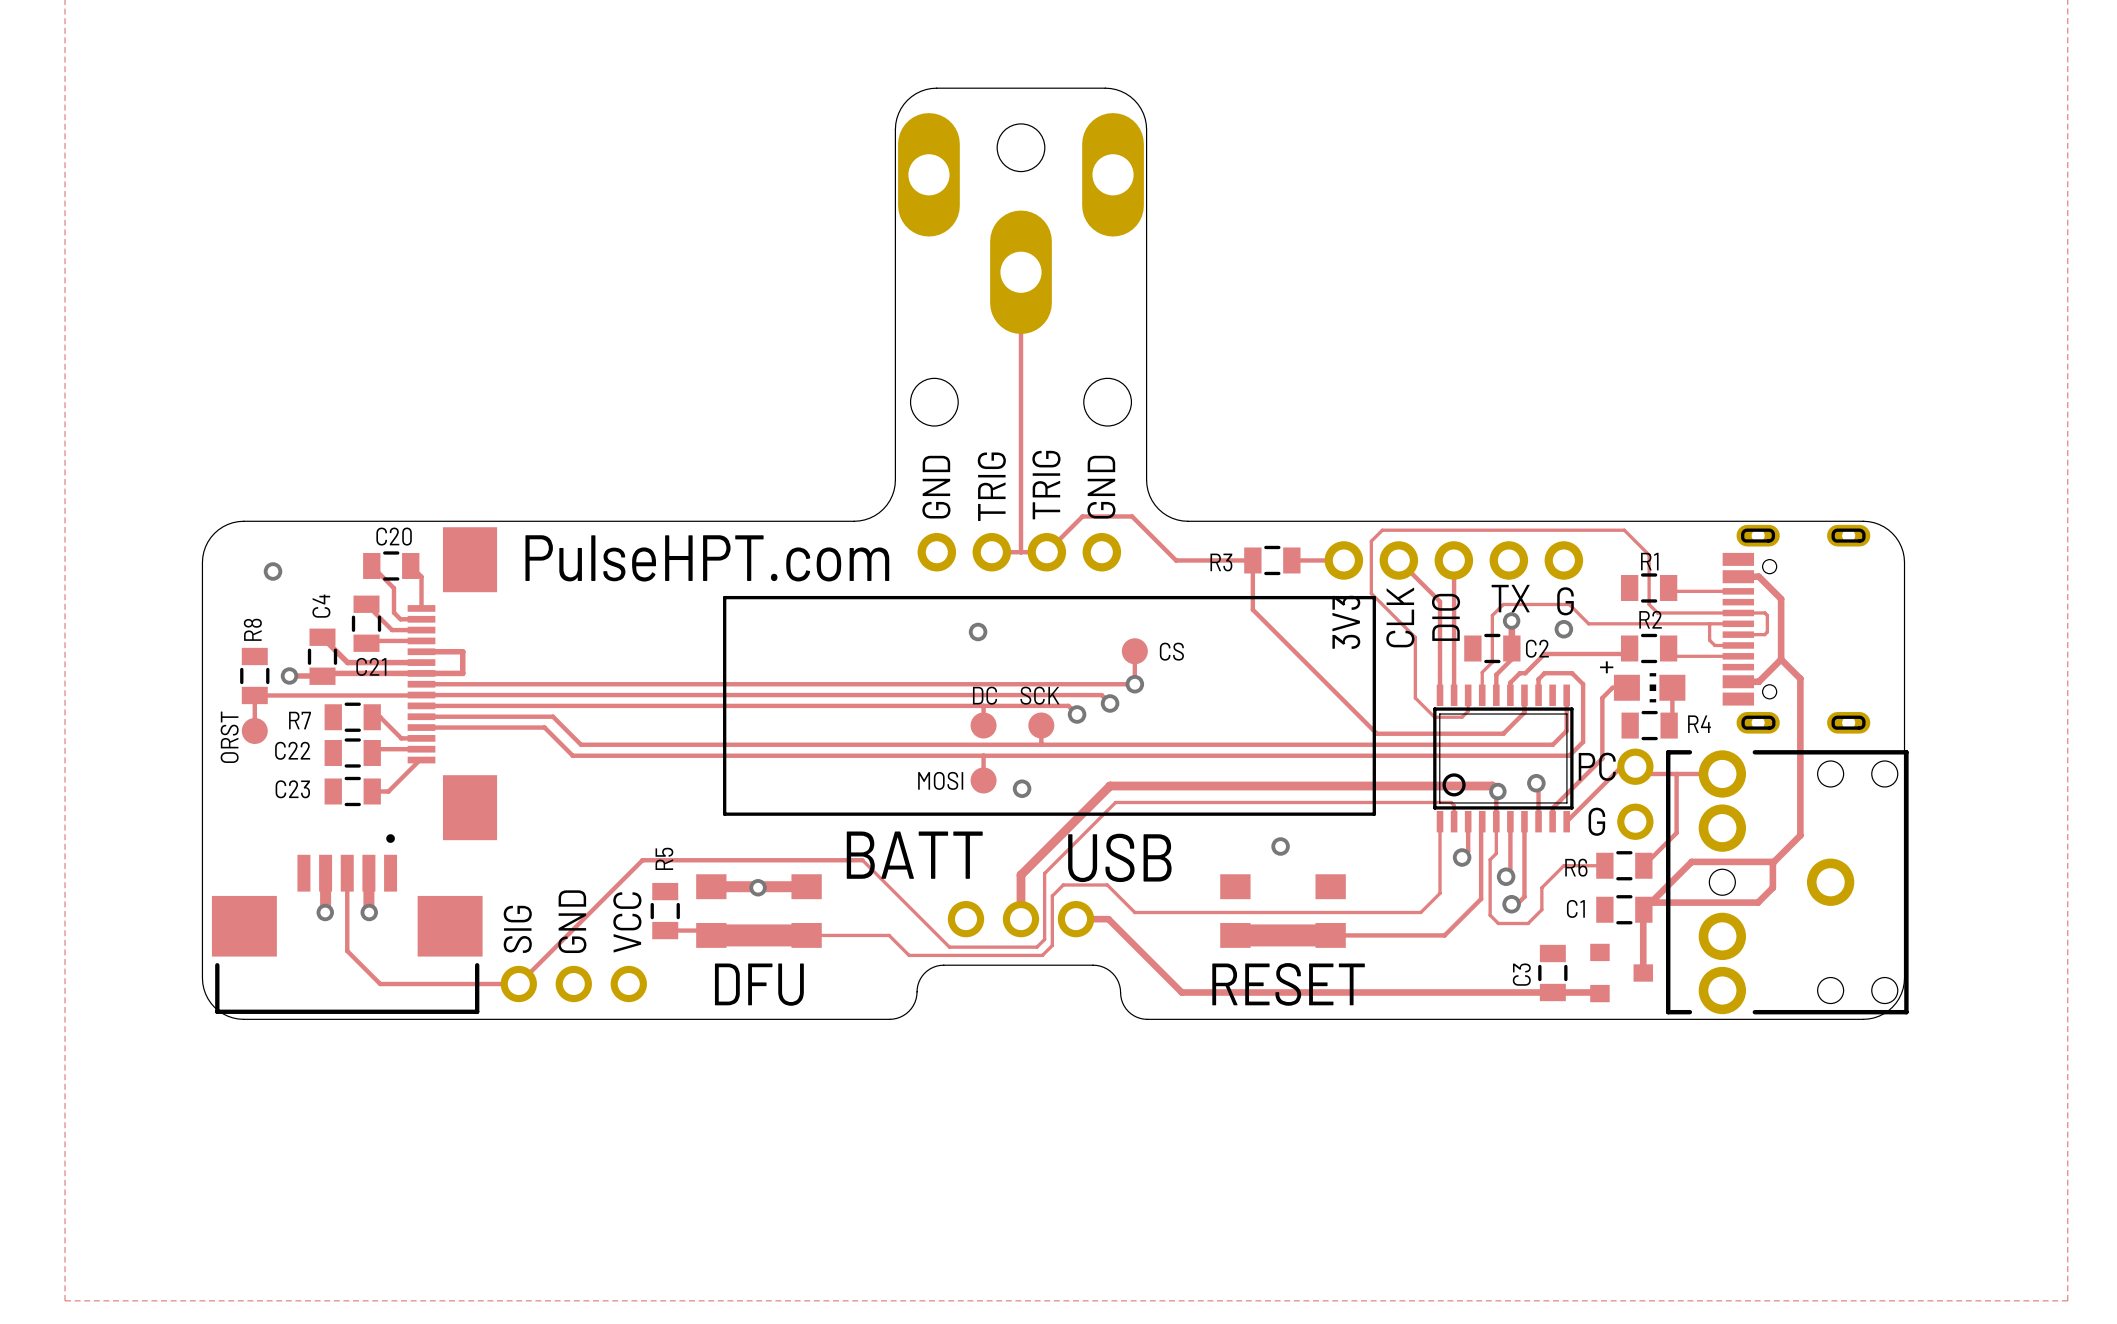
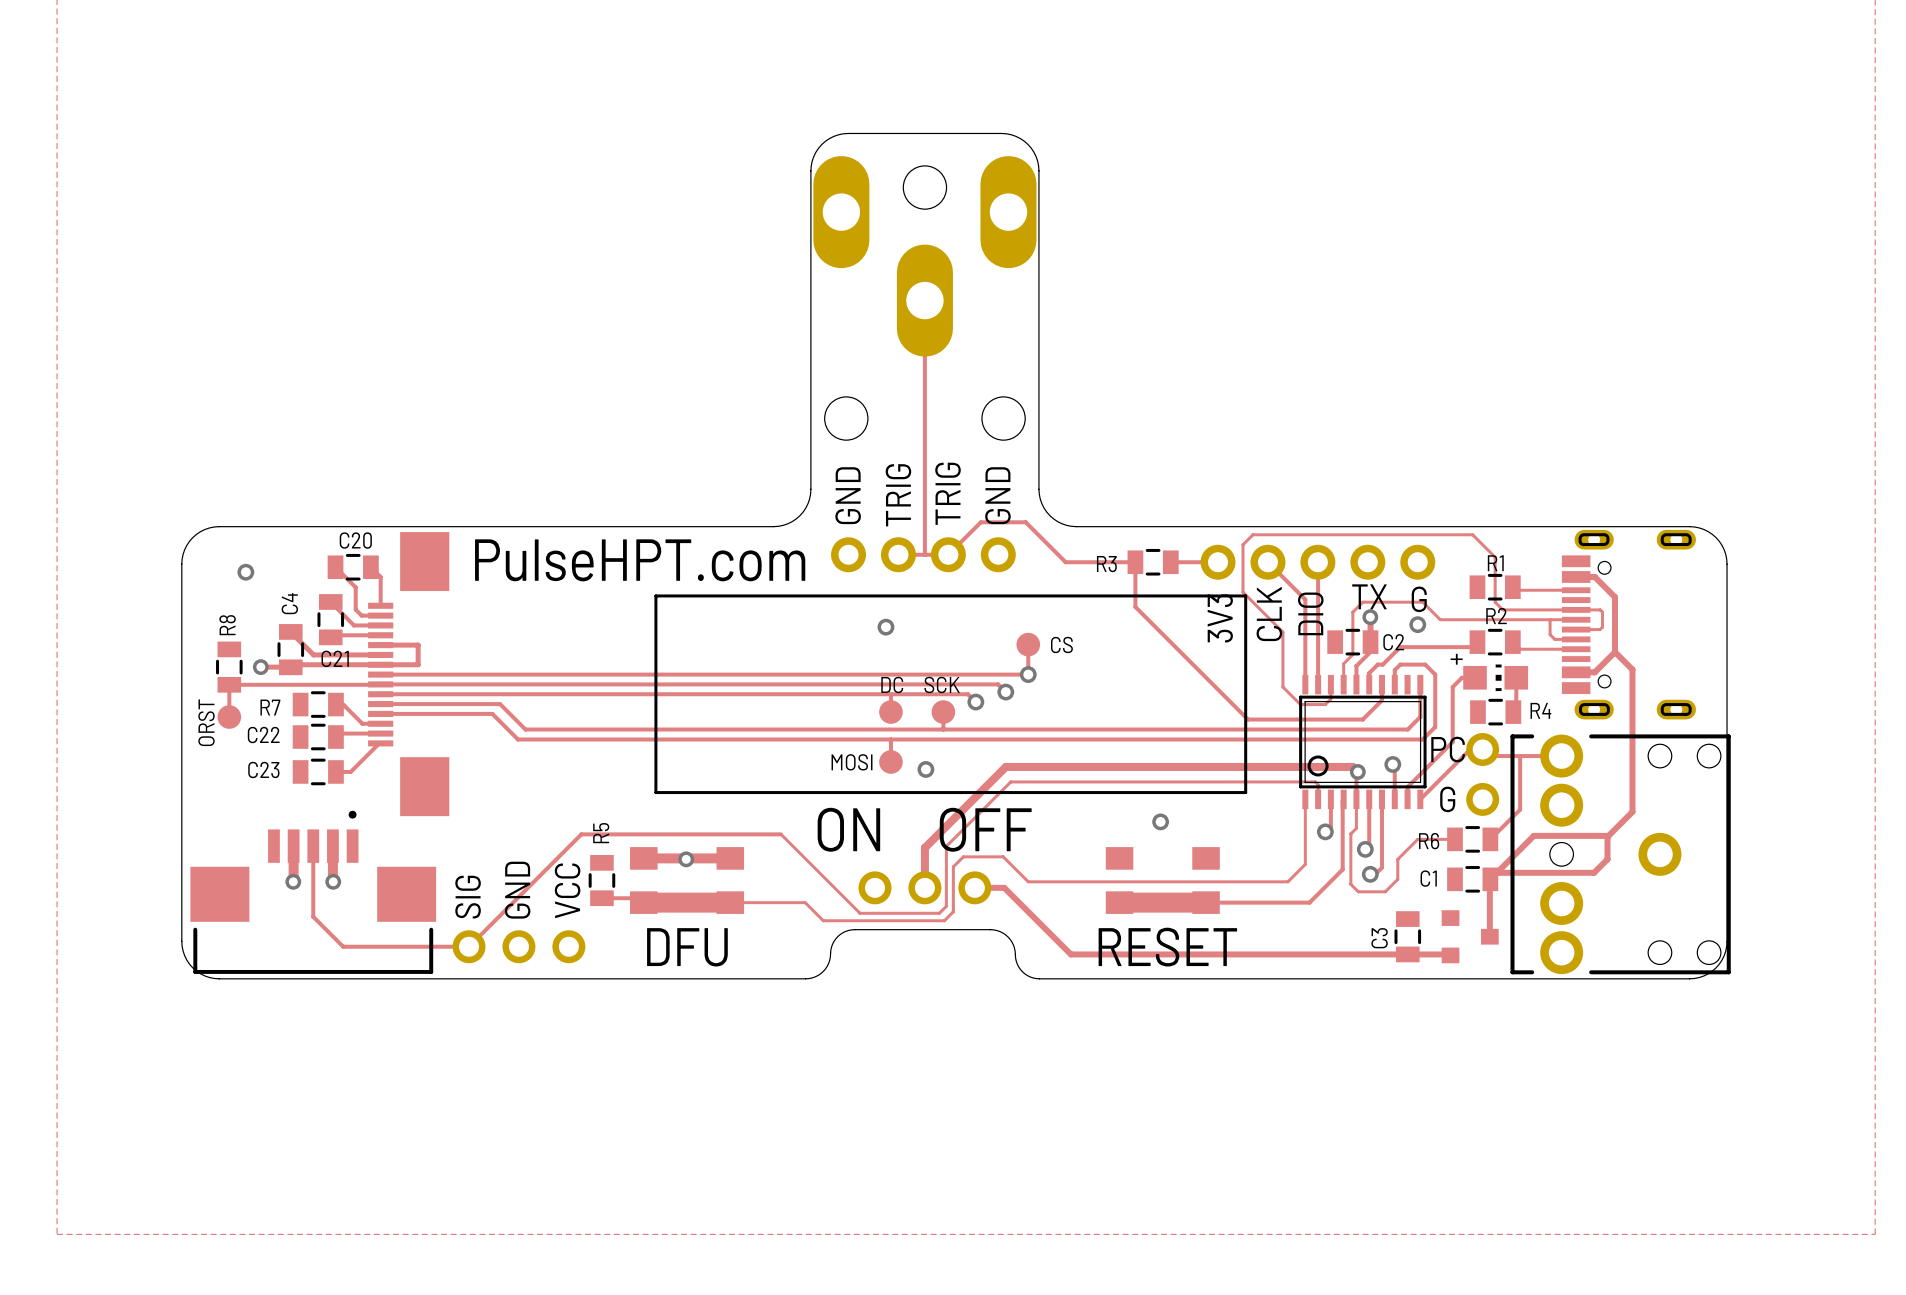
text: BATT (914, 855) -> none
text: none -> ON (848, 829)
text: none -> OFF (985, 829)
text: USB (1119, 857) -> none

